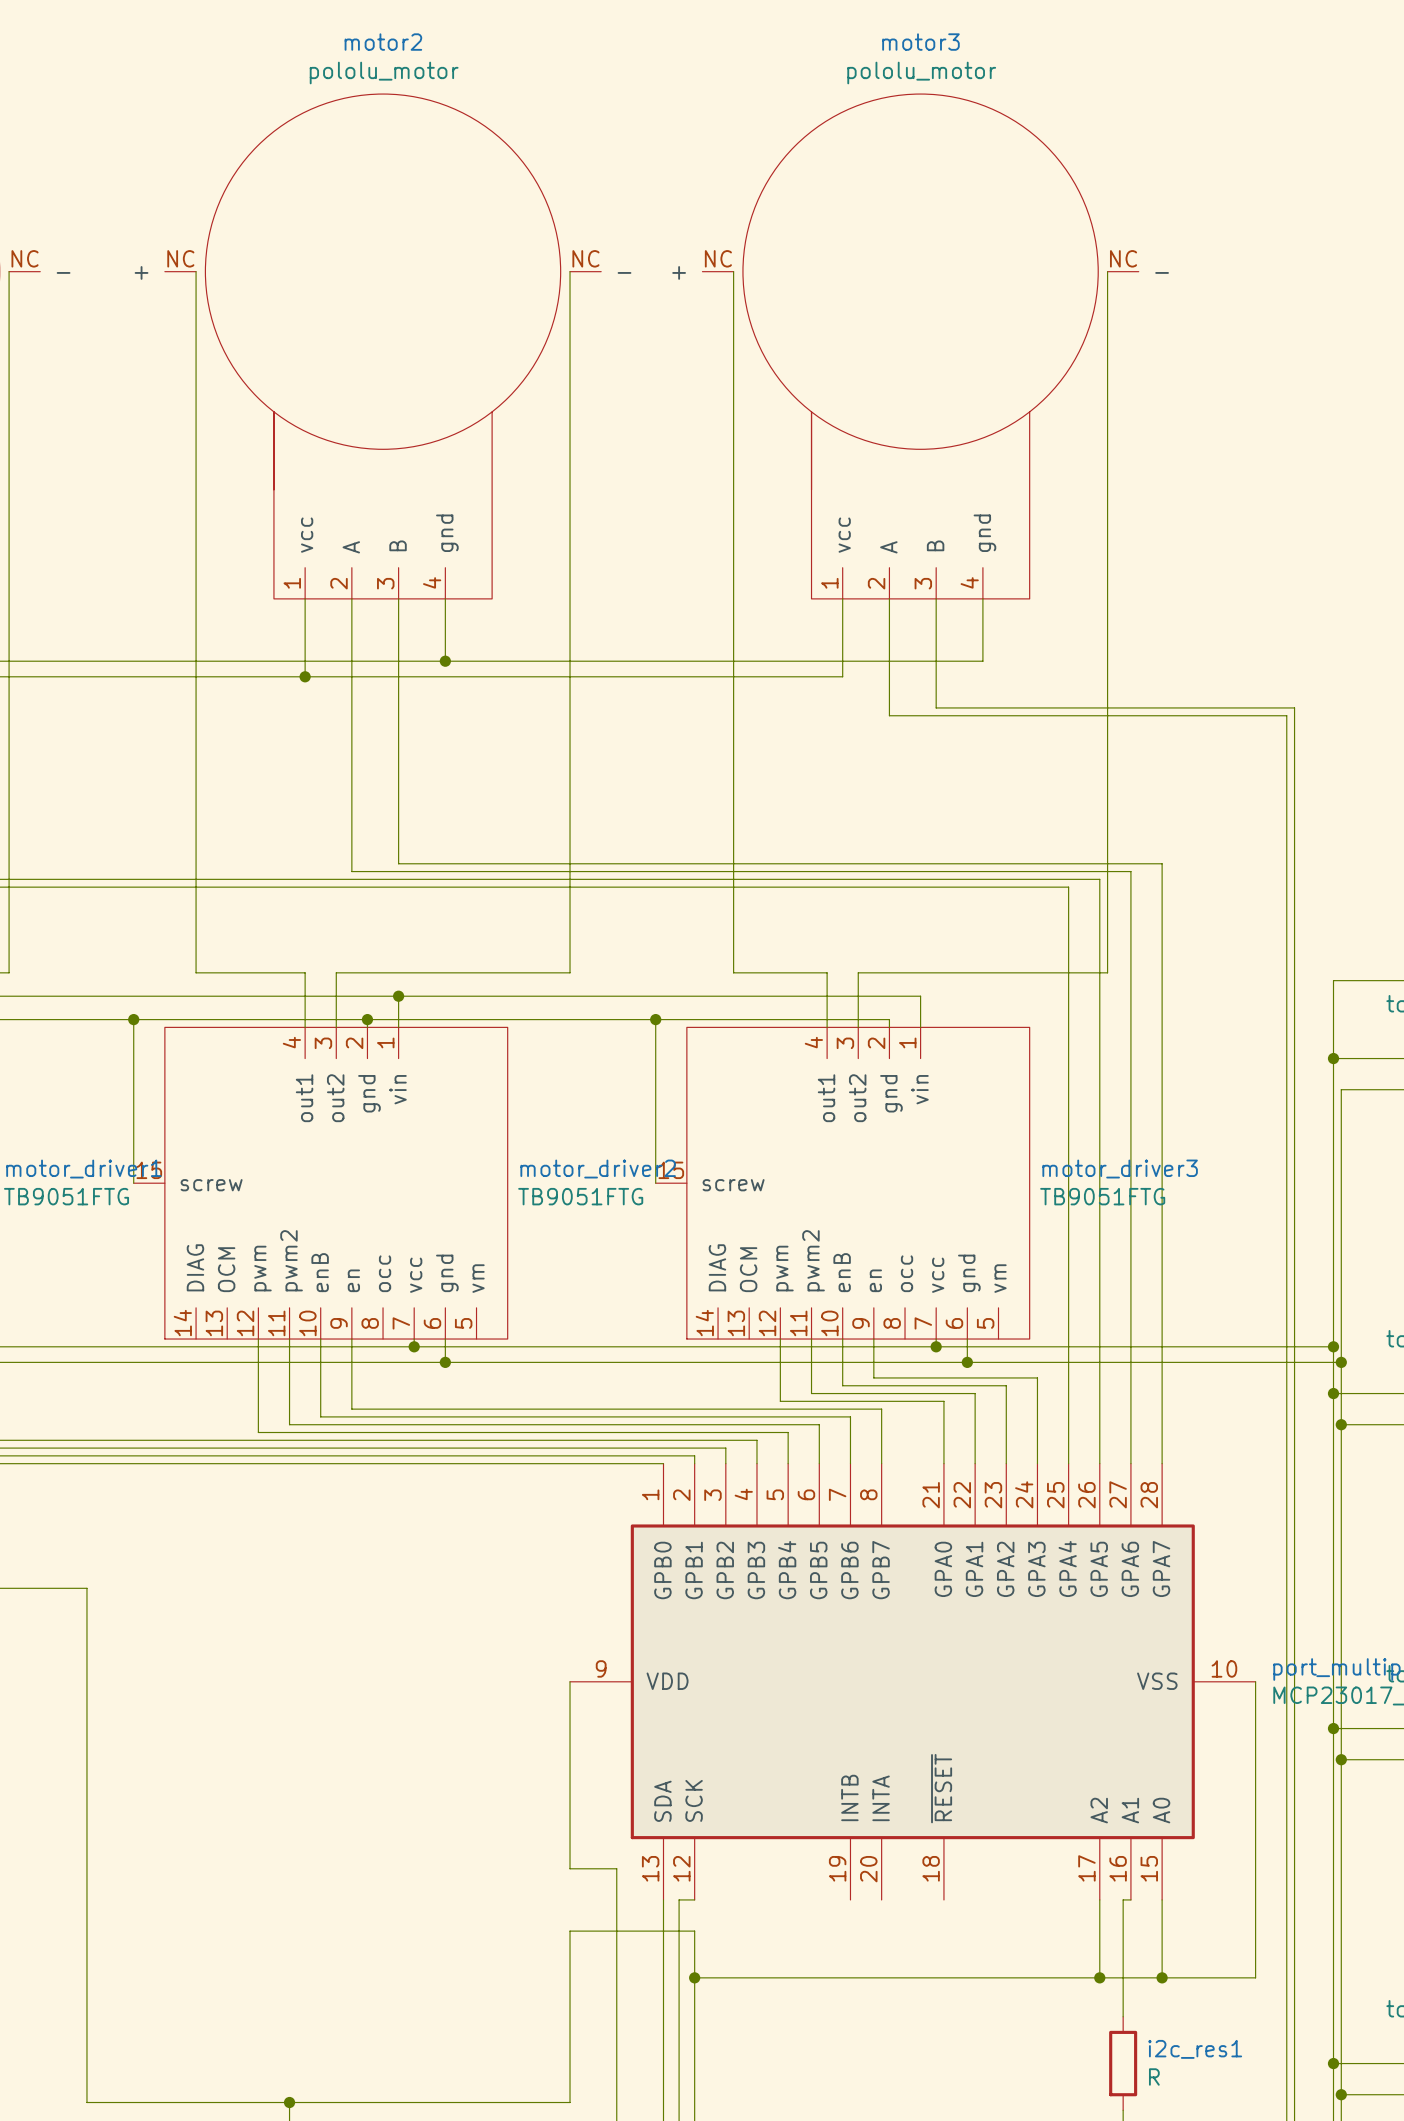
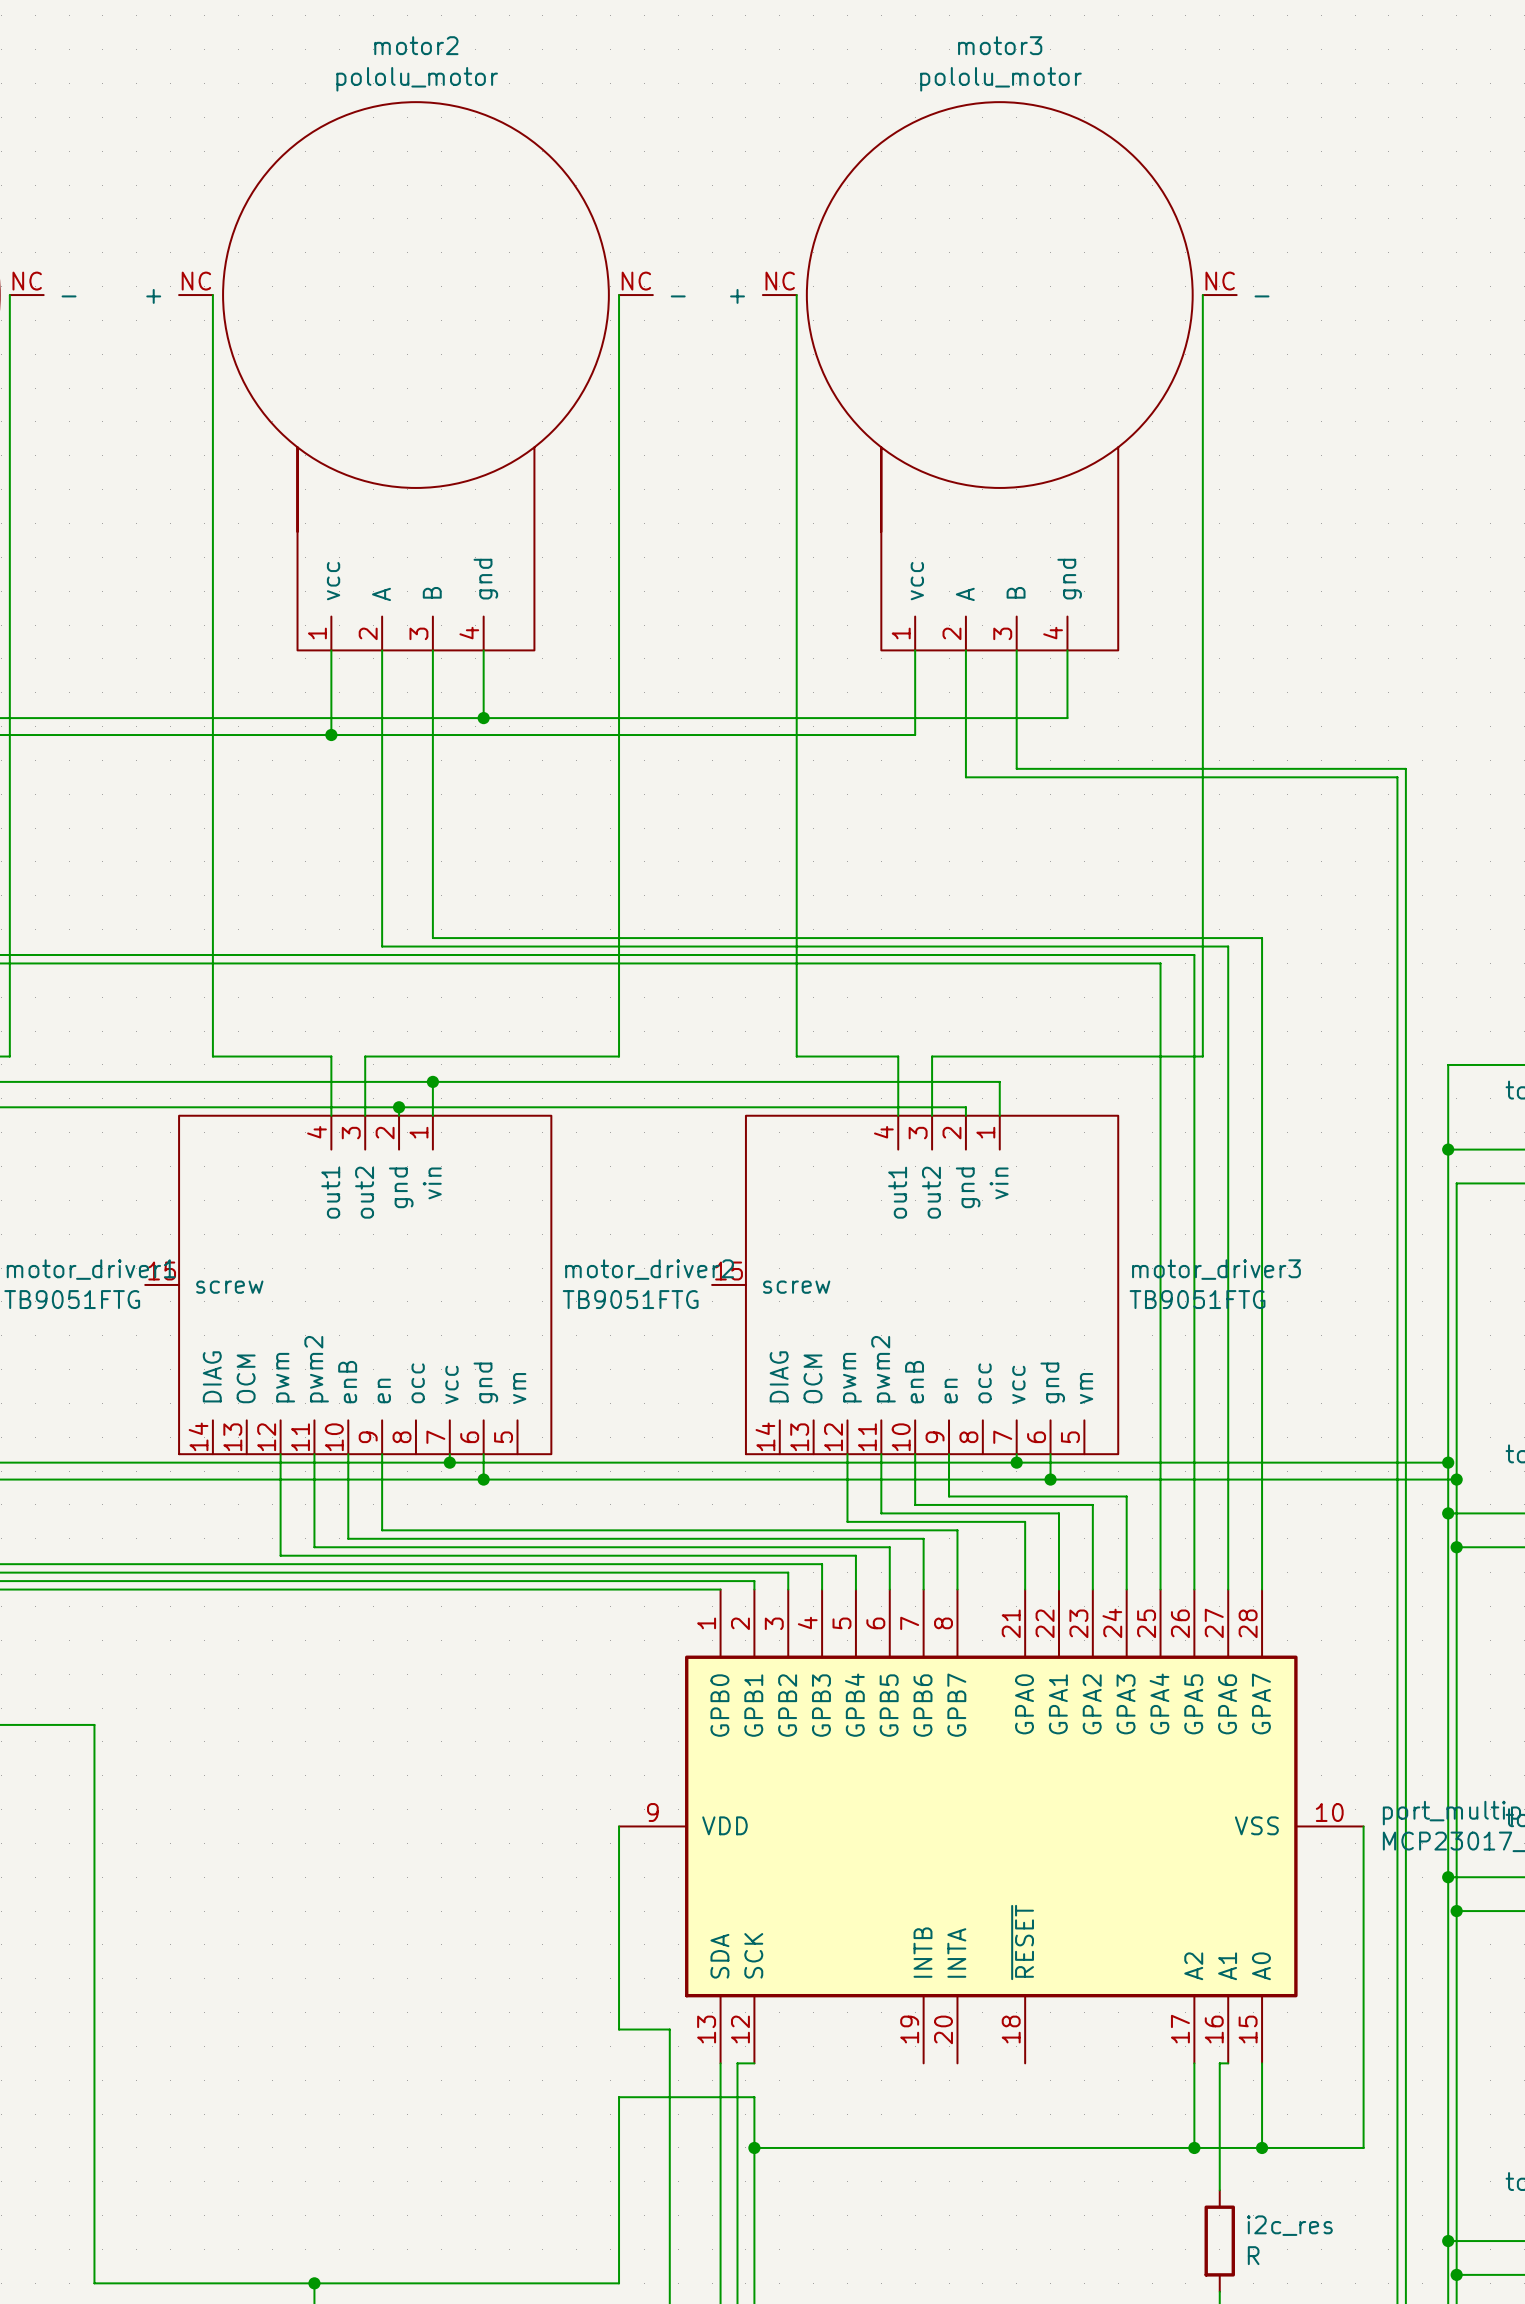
wire: (133, 1019) (133, 1183) -> none
junction: (133, 1019) -> none
wire: (655, 1019) (655, 1183) -> none
junction: (655, 1019) -> none
i2c_res1 name: i2c_res1 (1195, 2049) -> i2c_res (1289, 2225)

